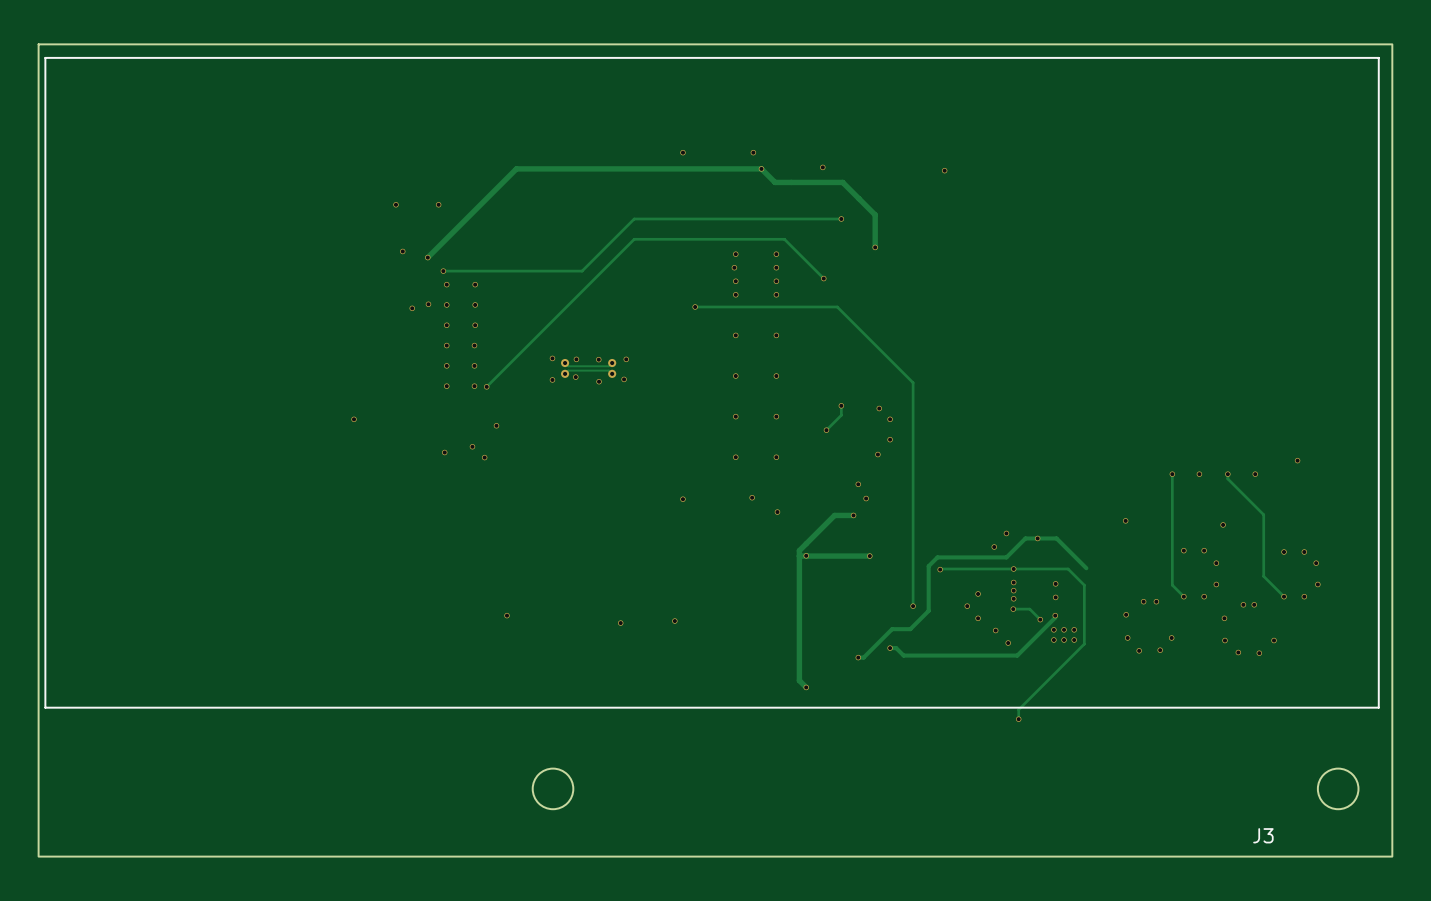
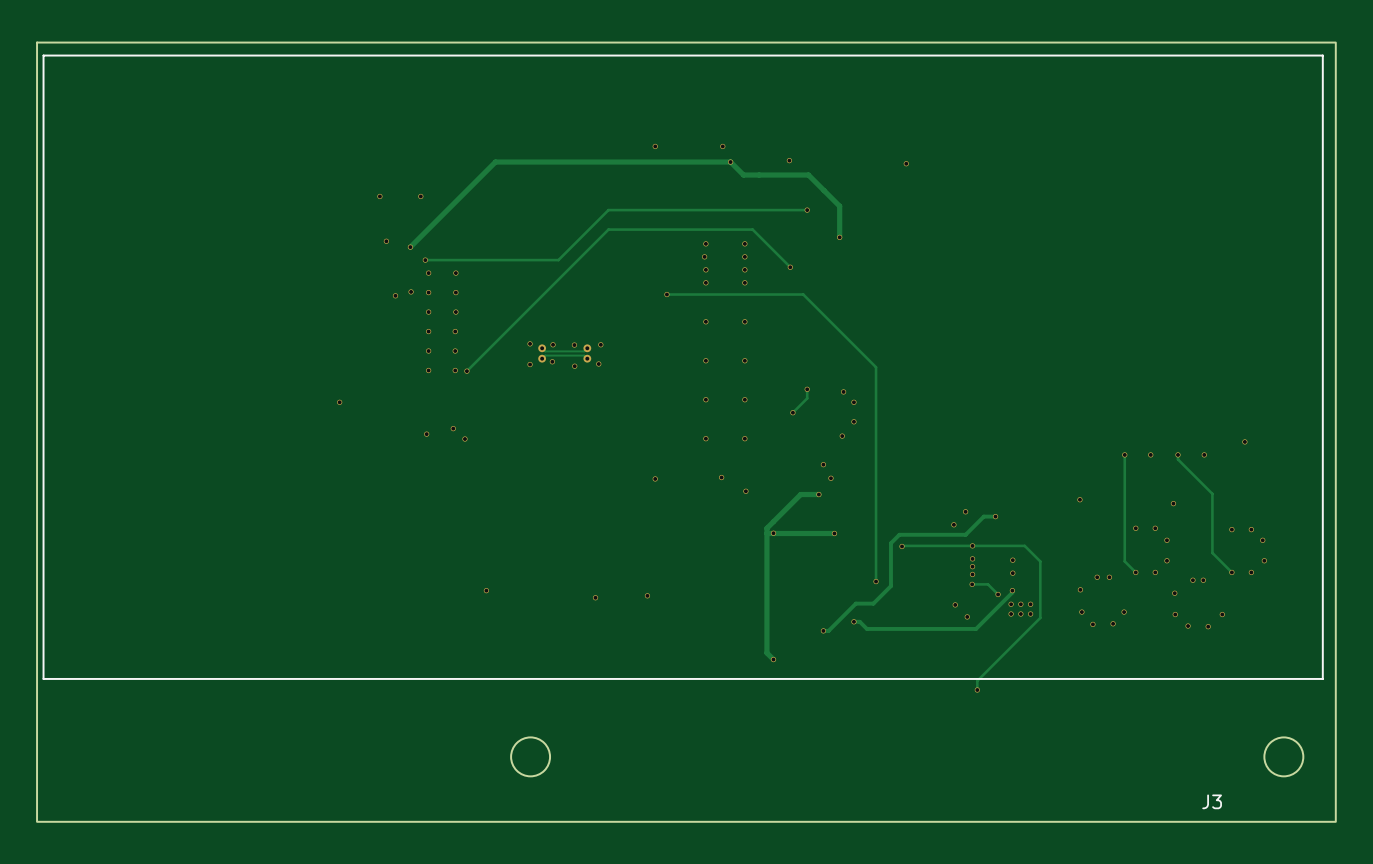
via: (496, 425) -> none
track: (1037, 538) (1056, 538) (1086, 568) -> none
via: (978, 593) -> none
via: (967, 606) -> none
via: (978, 618) -> none

